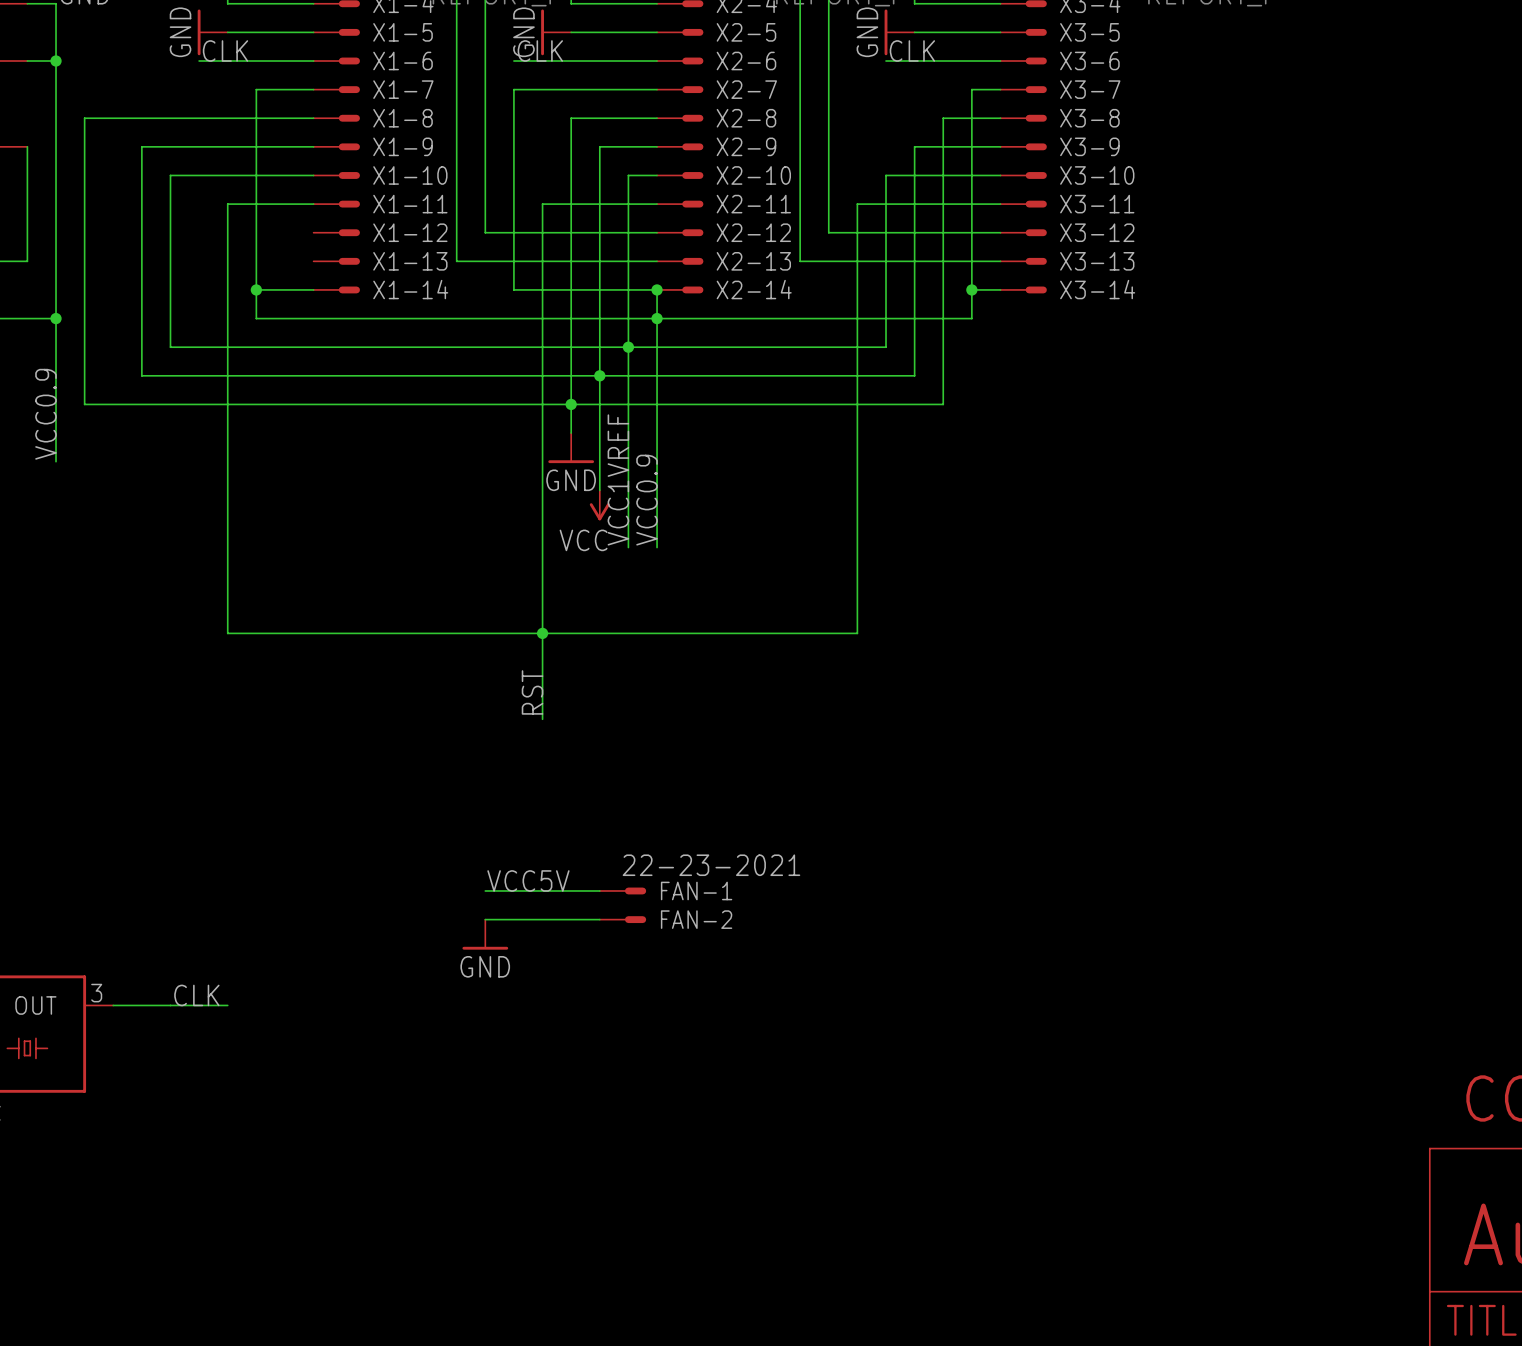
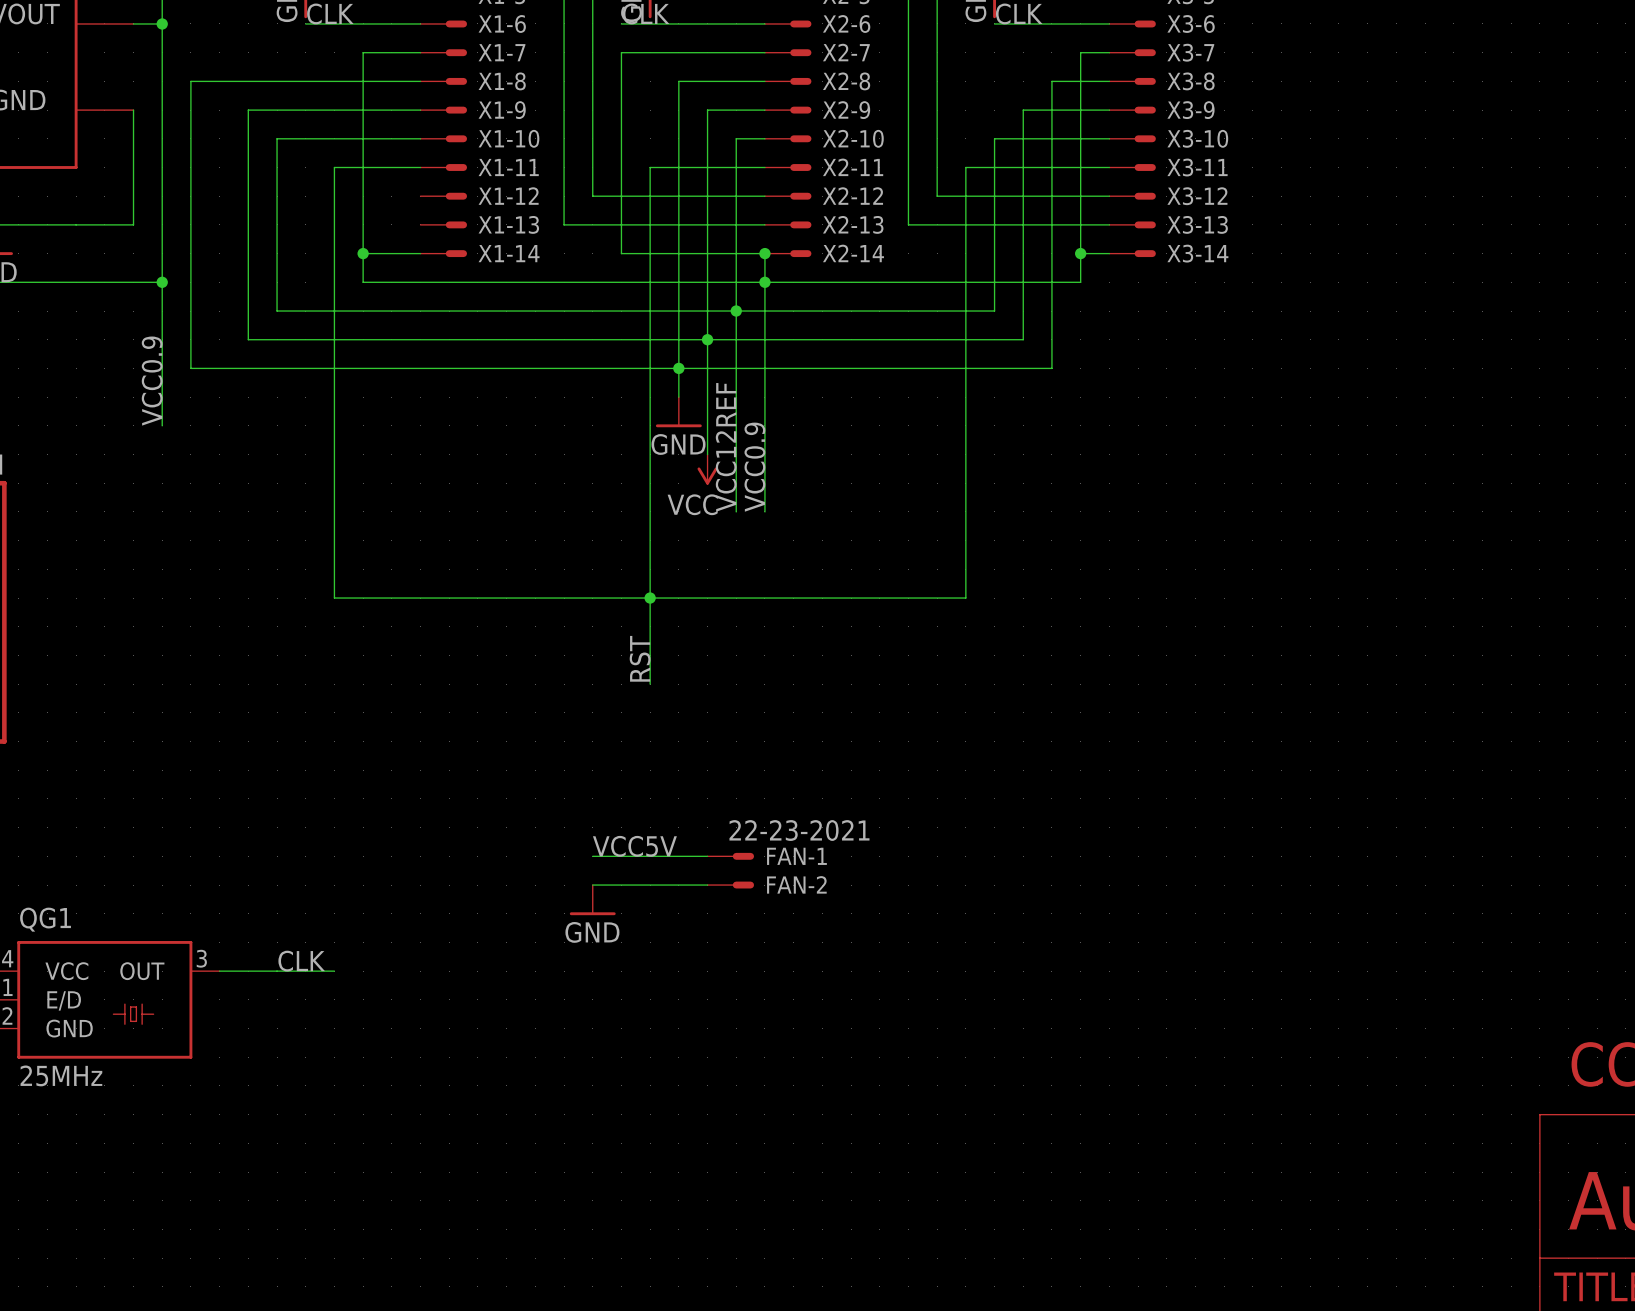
text: VCC1VREF (618, 479) -> VCC12REF (726, 447)

